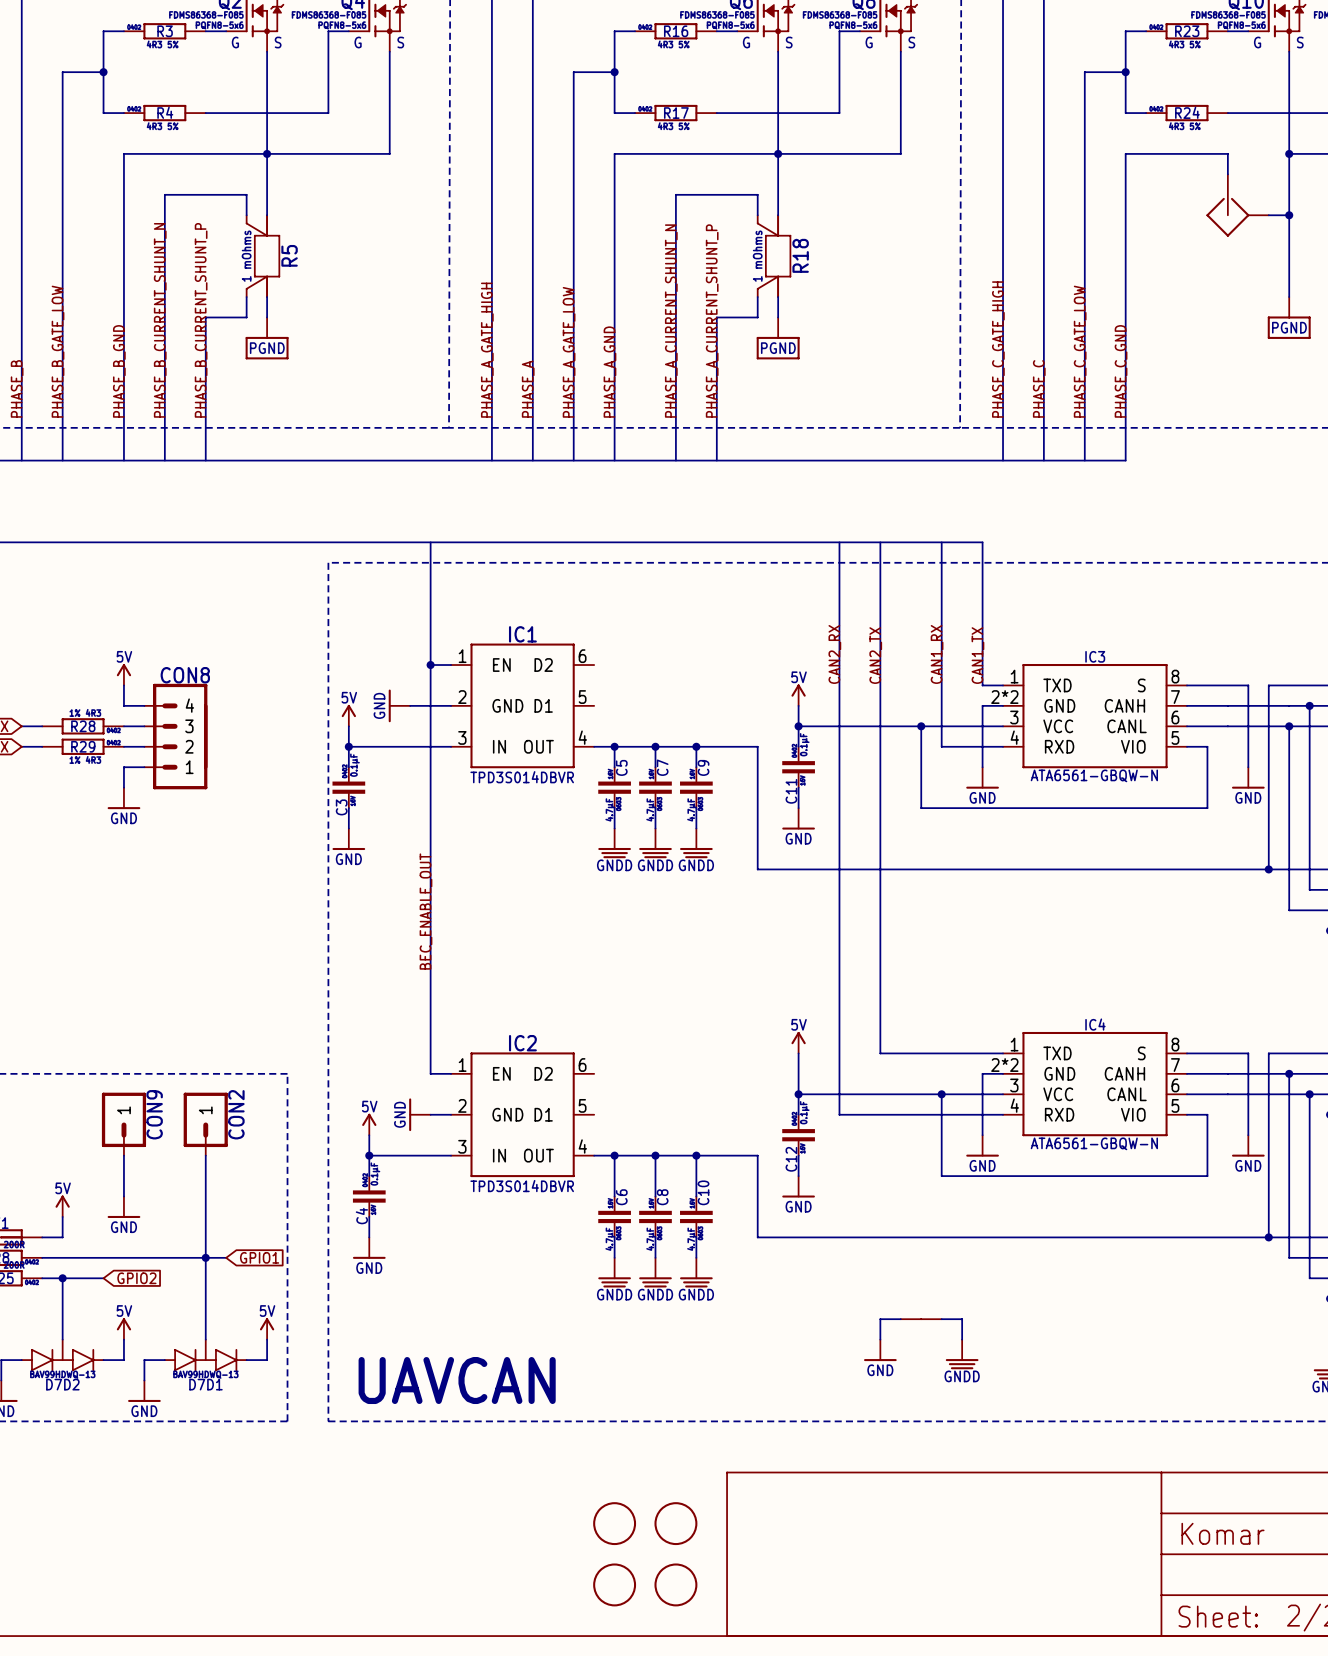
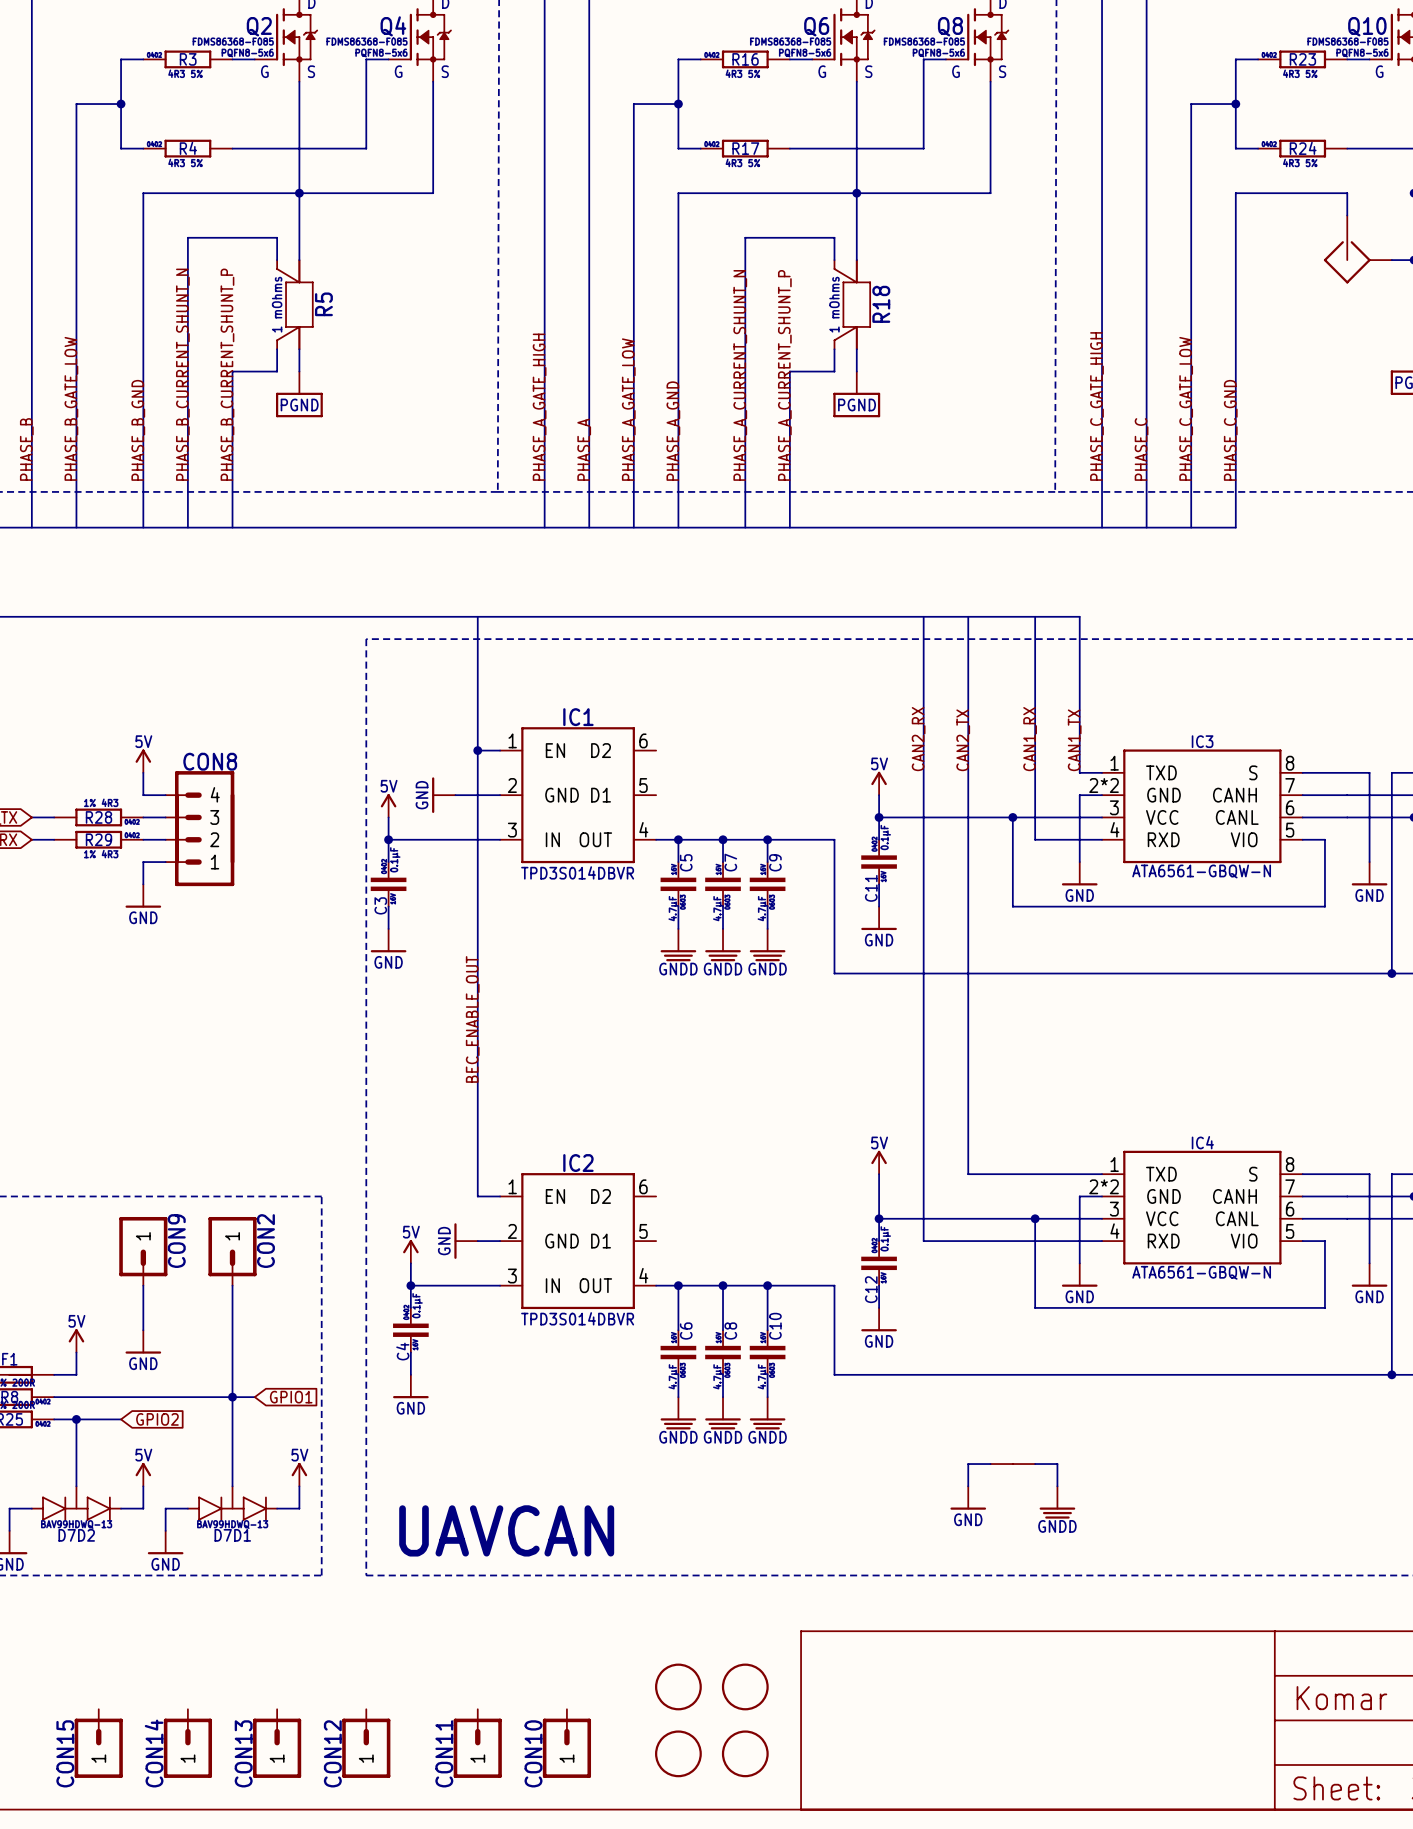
CON15: none -> (98, 1743)
CON14: none -> (187, 1743)
CON13: none -> (277, 1743)
CON12: none -> (366, 1743)
CON11: none -> (477, 1743)
CON10: none -> (566, 1743)

